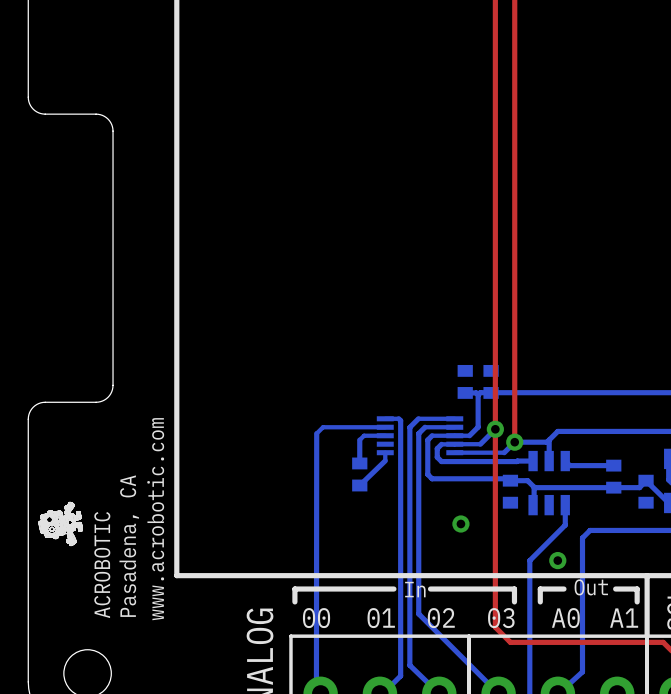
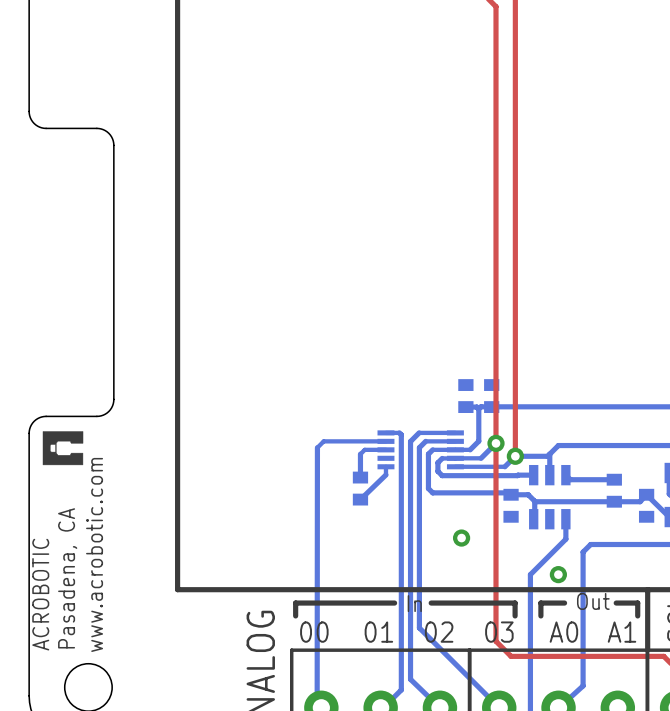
drawing: none -> [42, 431, 84, 466]
drawing: [38, 502, 83, 546] -> none
text position: www.acrobotic.com (155, 519) -> www.acrobotic.com (94, 554)
text position: Pasadena, CA (129, 546) -> Pasadena, CA (67, 578)
text position: ACROBOTIC (102, 565) -> ACROBOTIC (40, 594)

